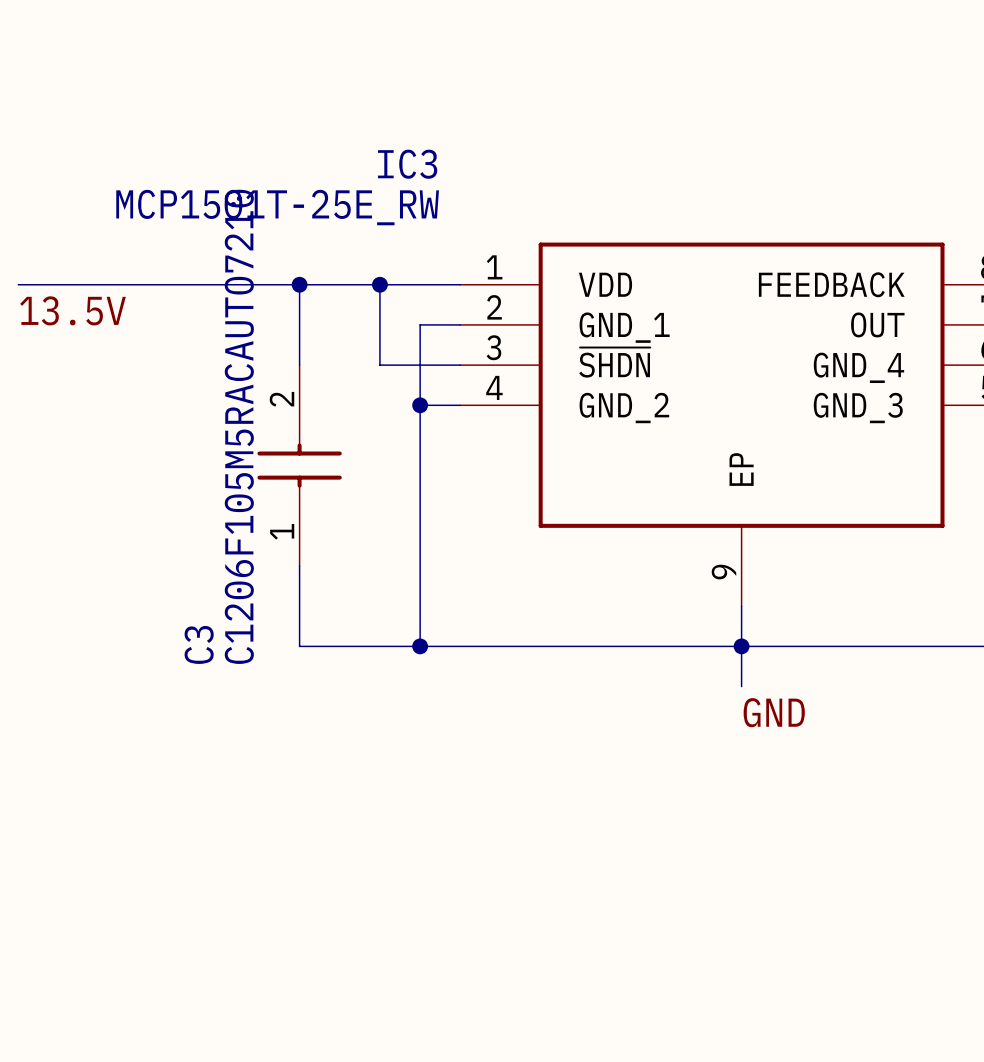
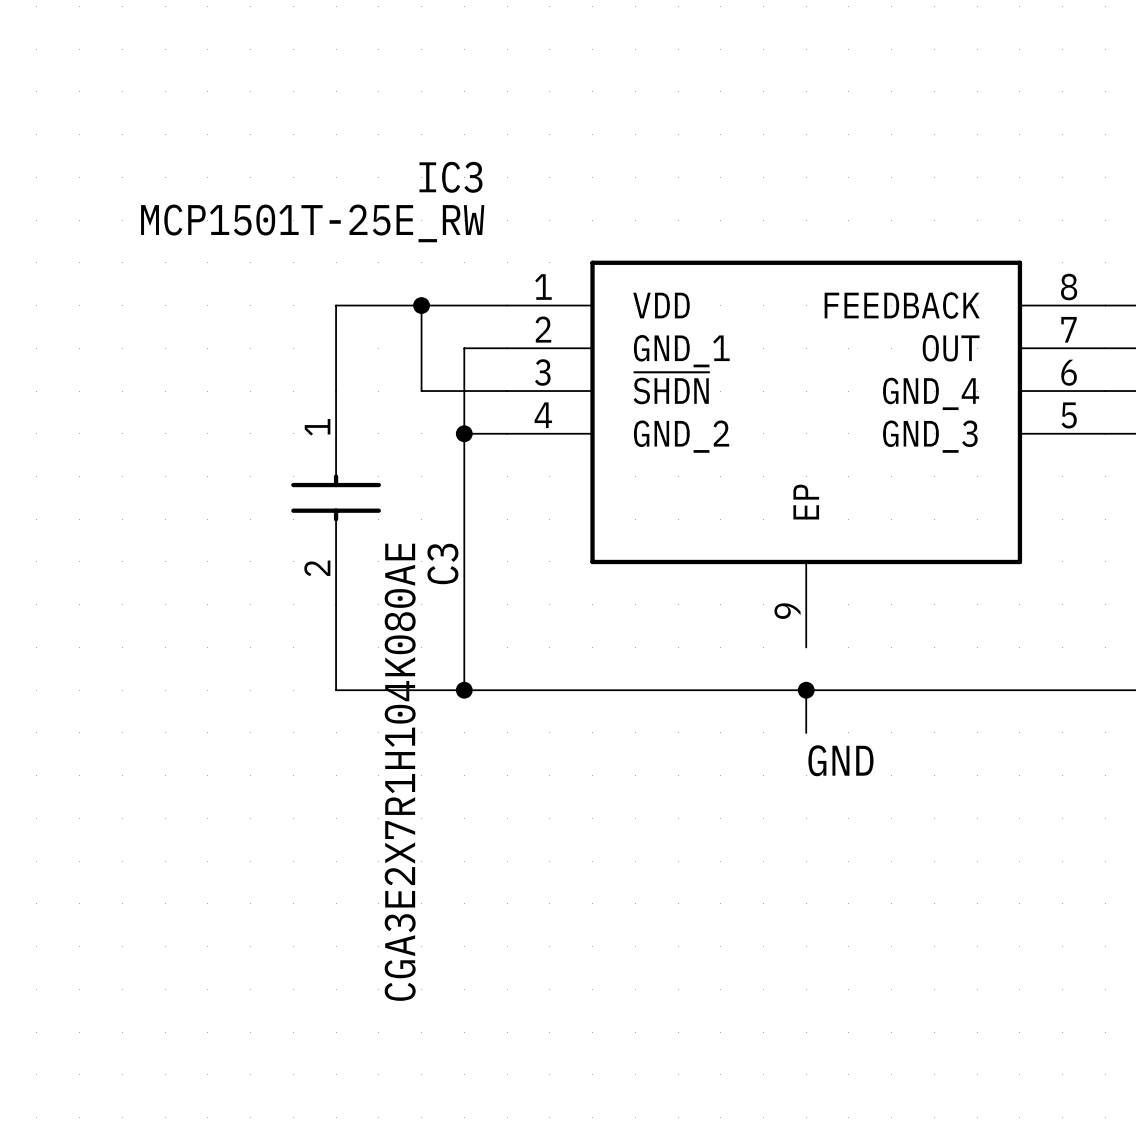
wire: (18, 284) (299, 284) -> none
junction: (299, 284) -> none
label: 13.5V (73, 310) -> none
C3 value: C1206F105M5RACAUTO7210 (239, 426) -> CGA3E2X7R1H104K080AE (400, 772)
C3 rotation: 0° (299, 465) -> 180° (336, 497)
wire: (741, 606) (741, 646) -> none
C3 name position: C3 (199, 644) -> C3 (442, 563)

